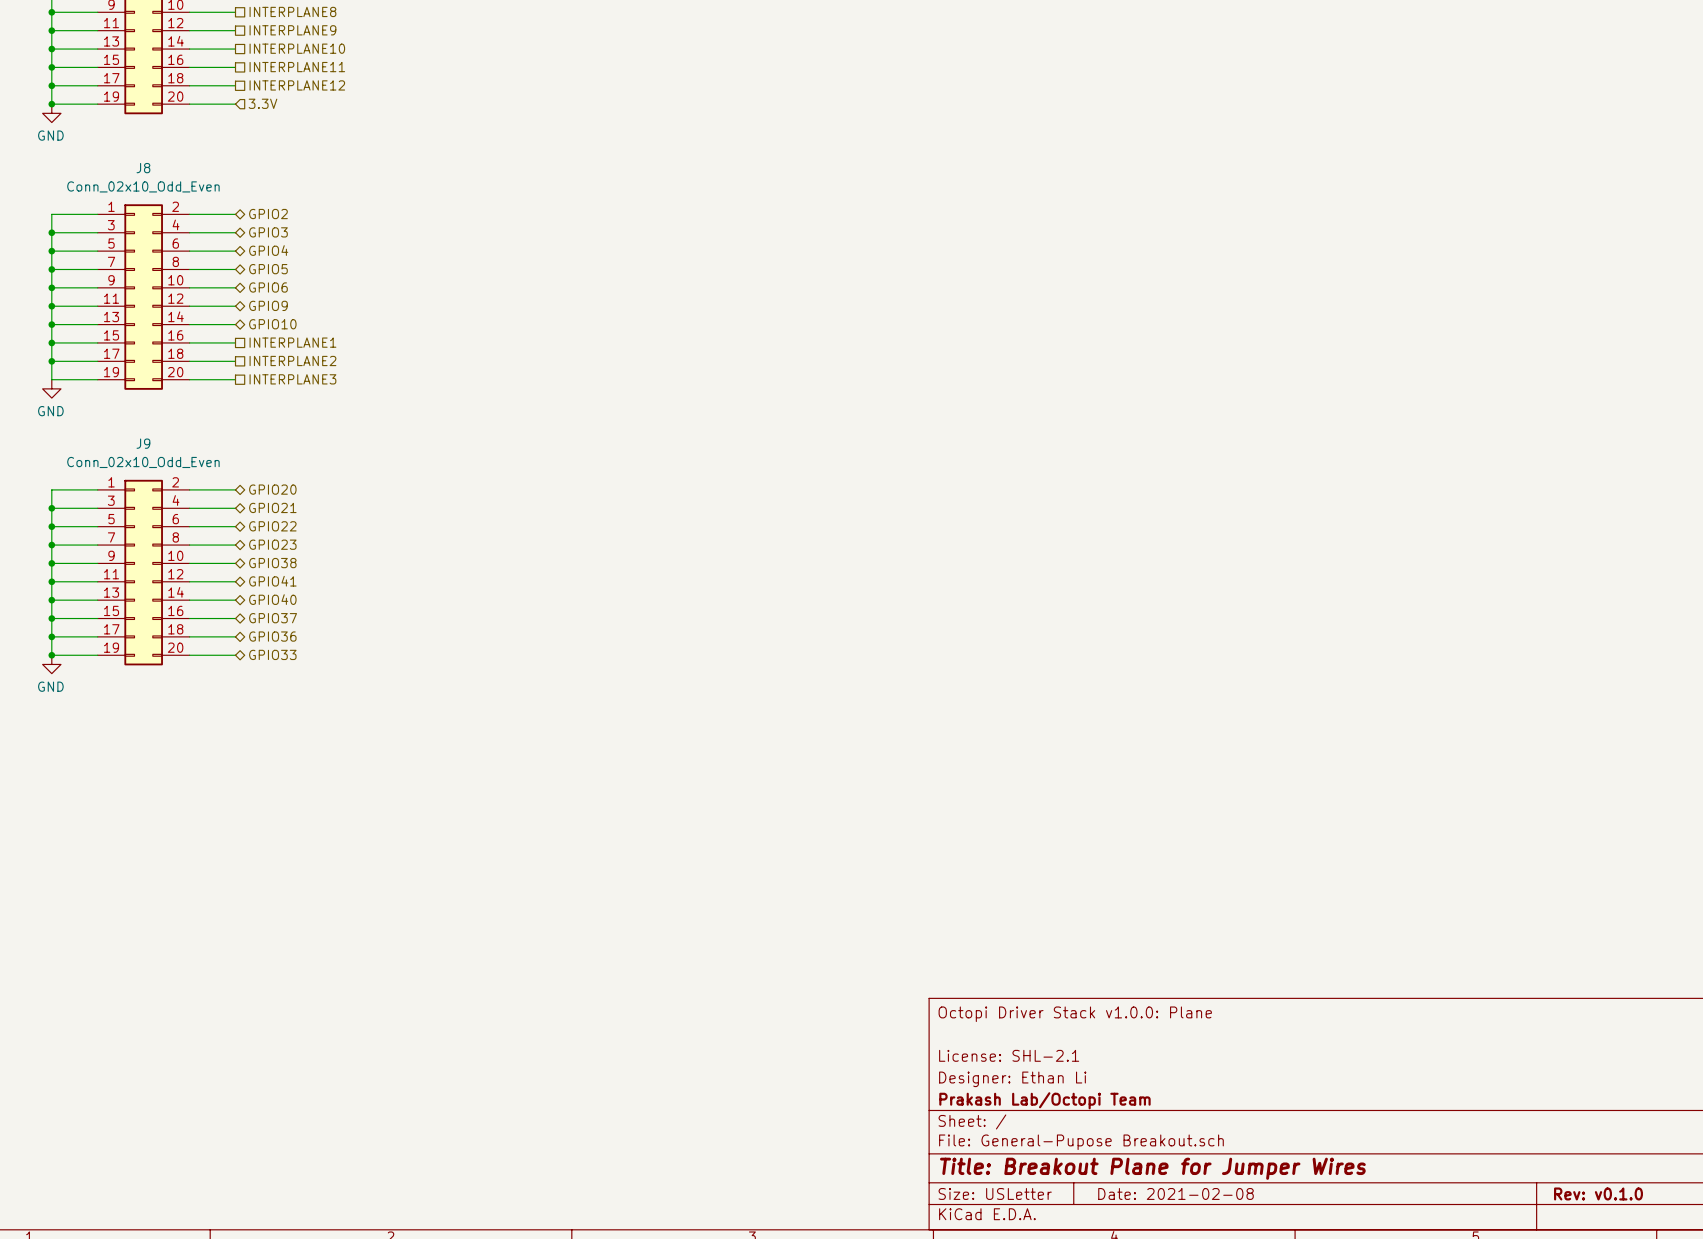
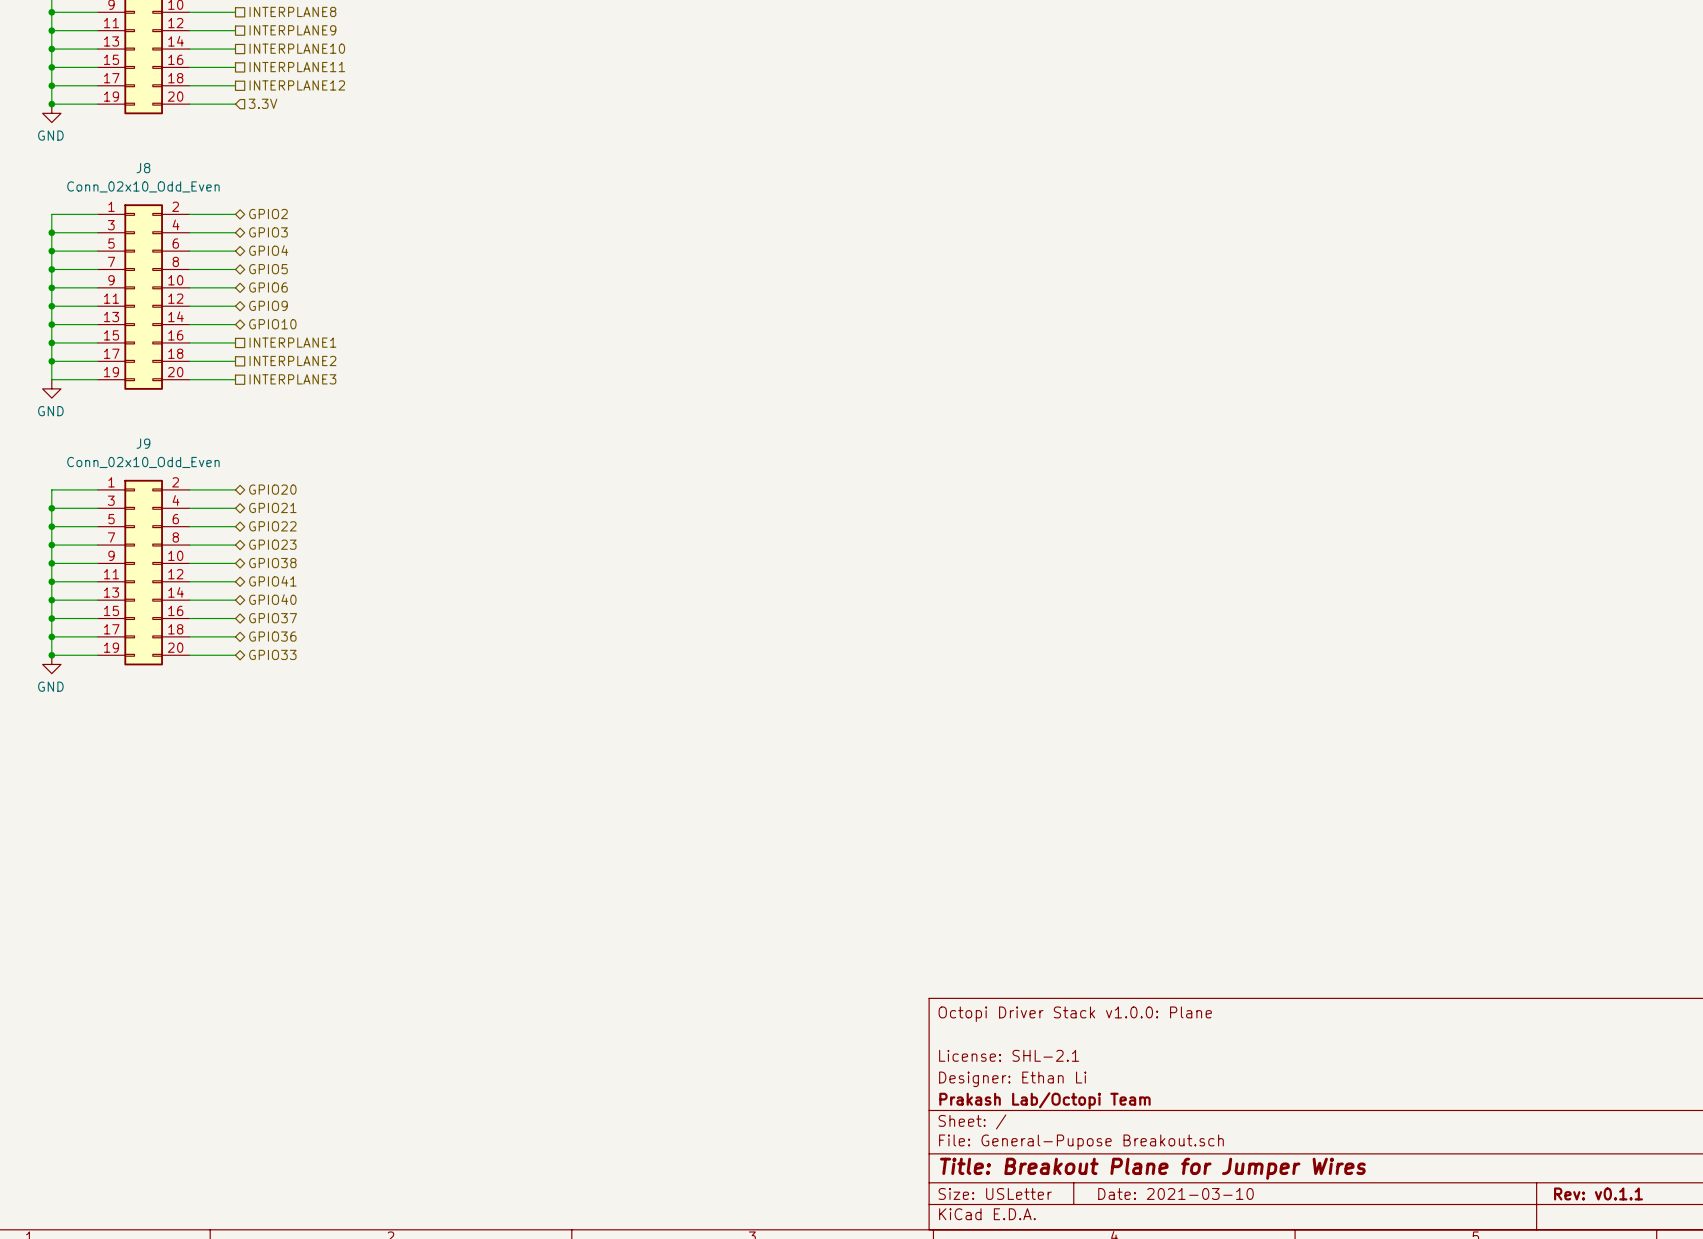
title block: Date: 2021-02-08 (1175, 1193) -> Date: 2021-03-10 (1175, 1193)
title block: Rev: v0.1.0 (1598, 1193) -> Rev: v0.1.1 (1598, 1193)

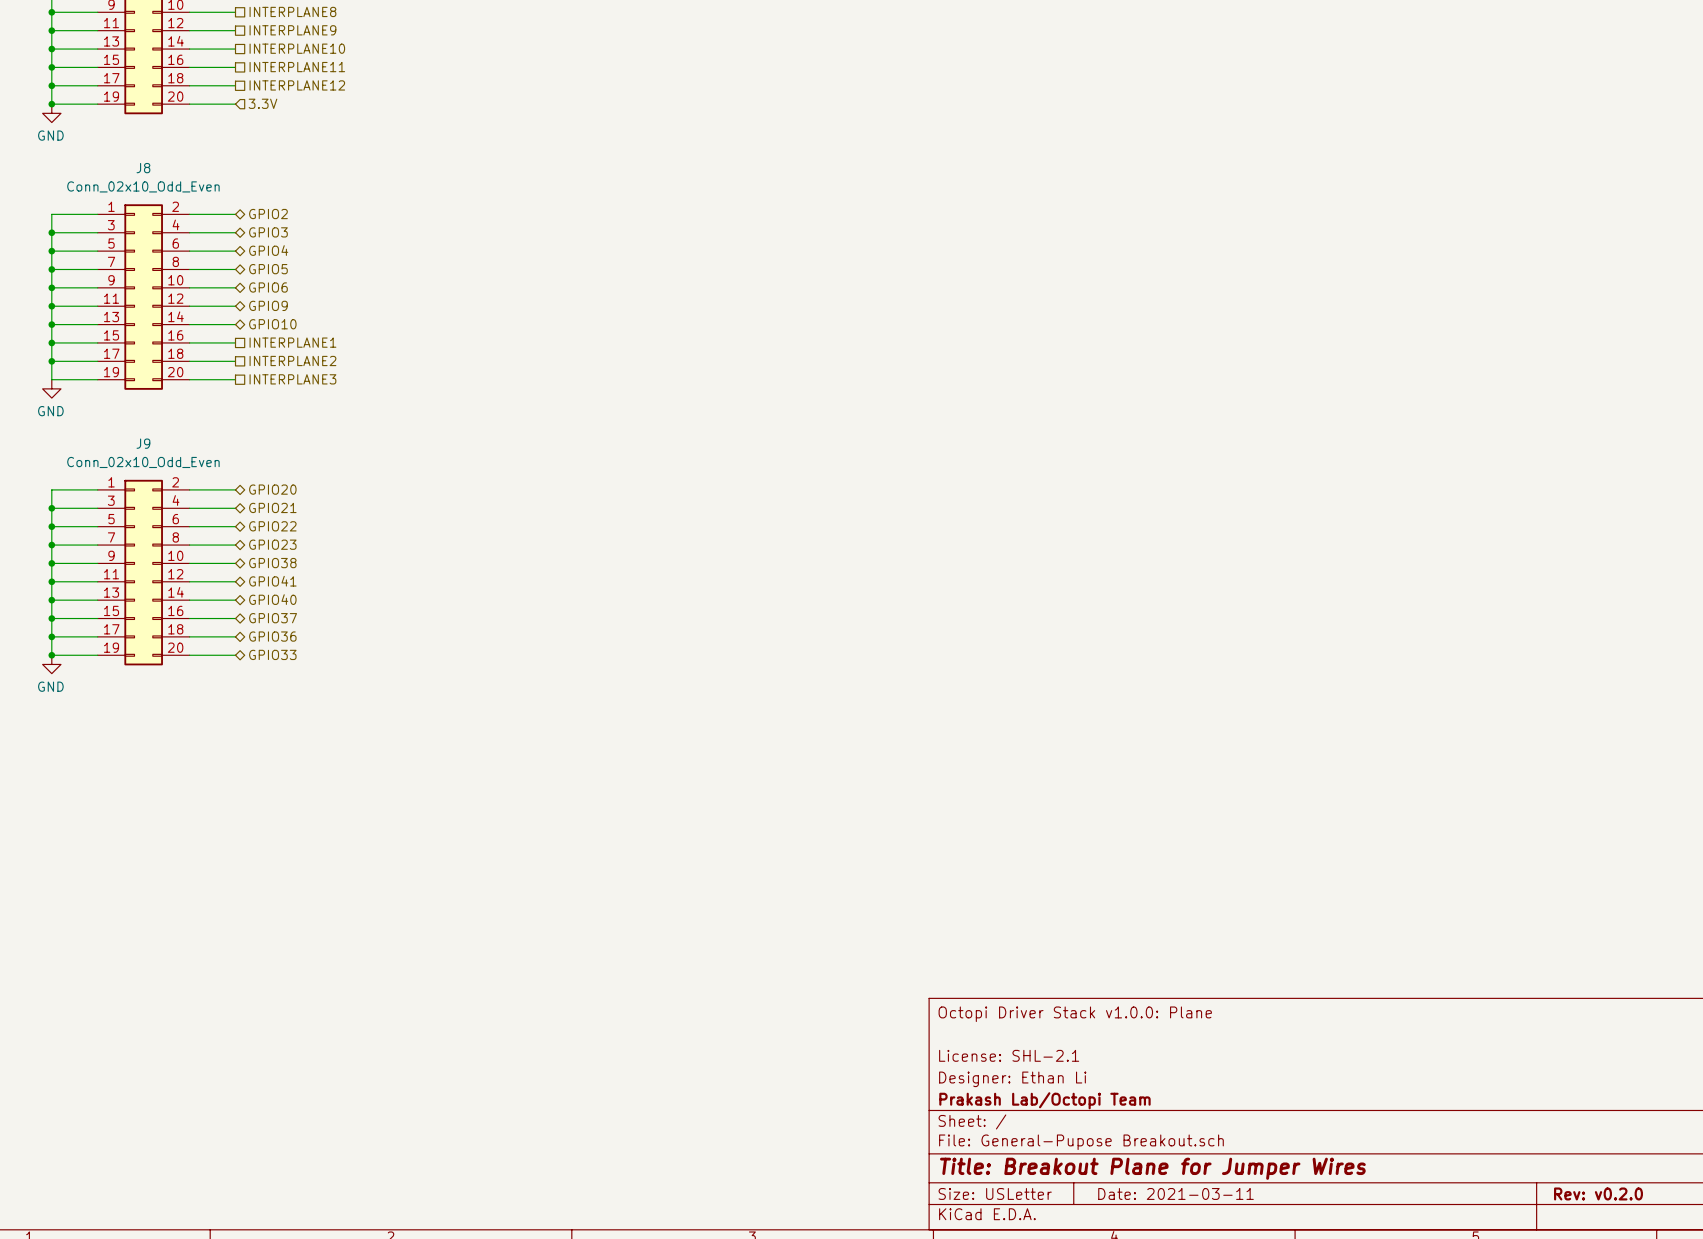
title block: Date: 2021-03-10 (1175, 1193) -> Date: 2021-03-11 (1175, 1193)
title block: Rev: v0.1.1 (1598, 1193) -> Rev: v0.2.0 (1598, 1193)

